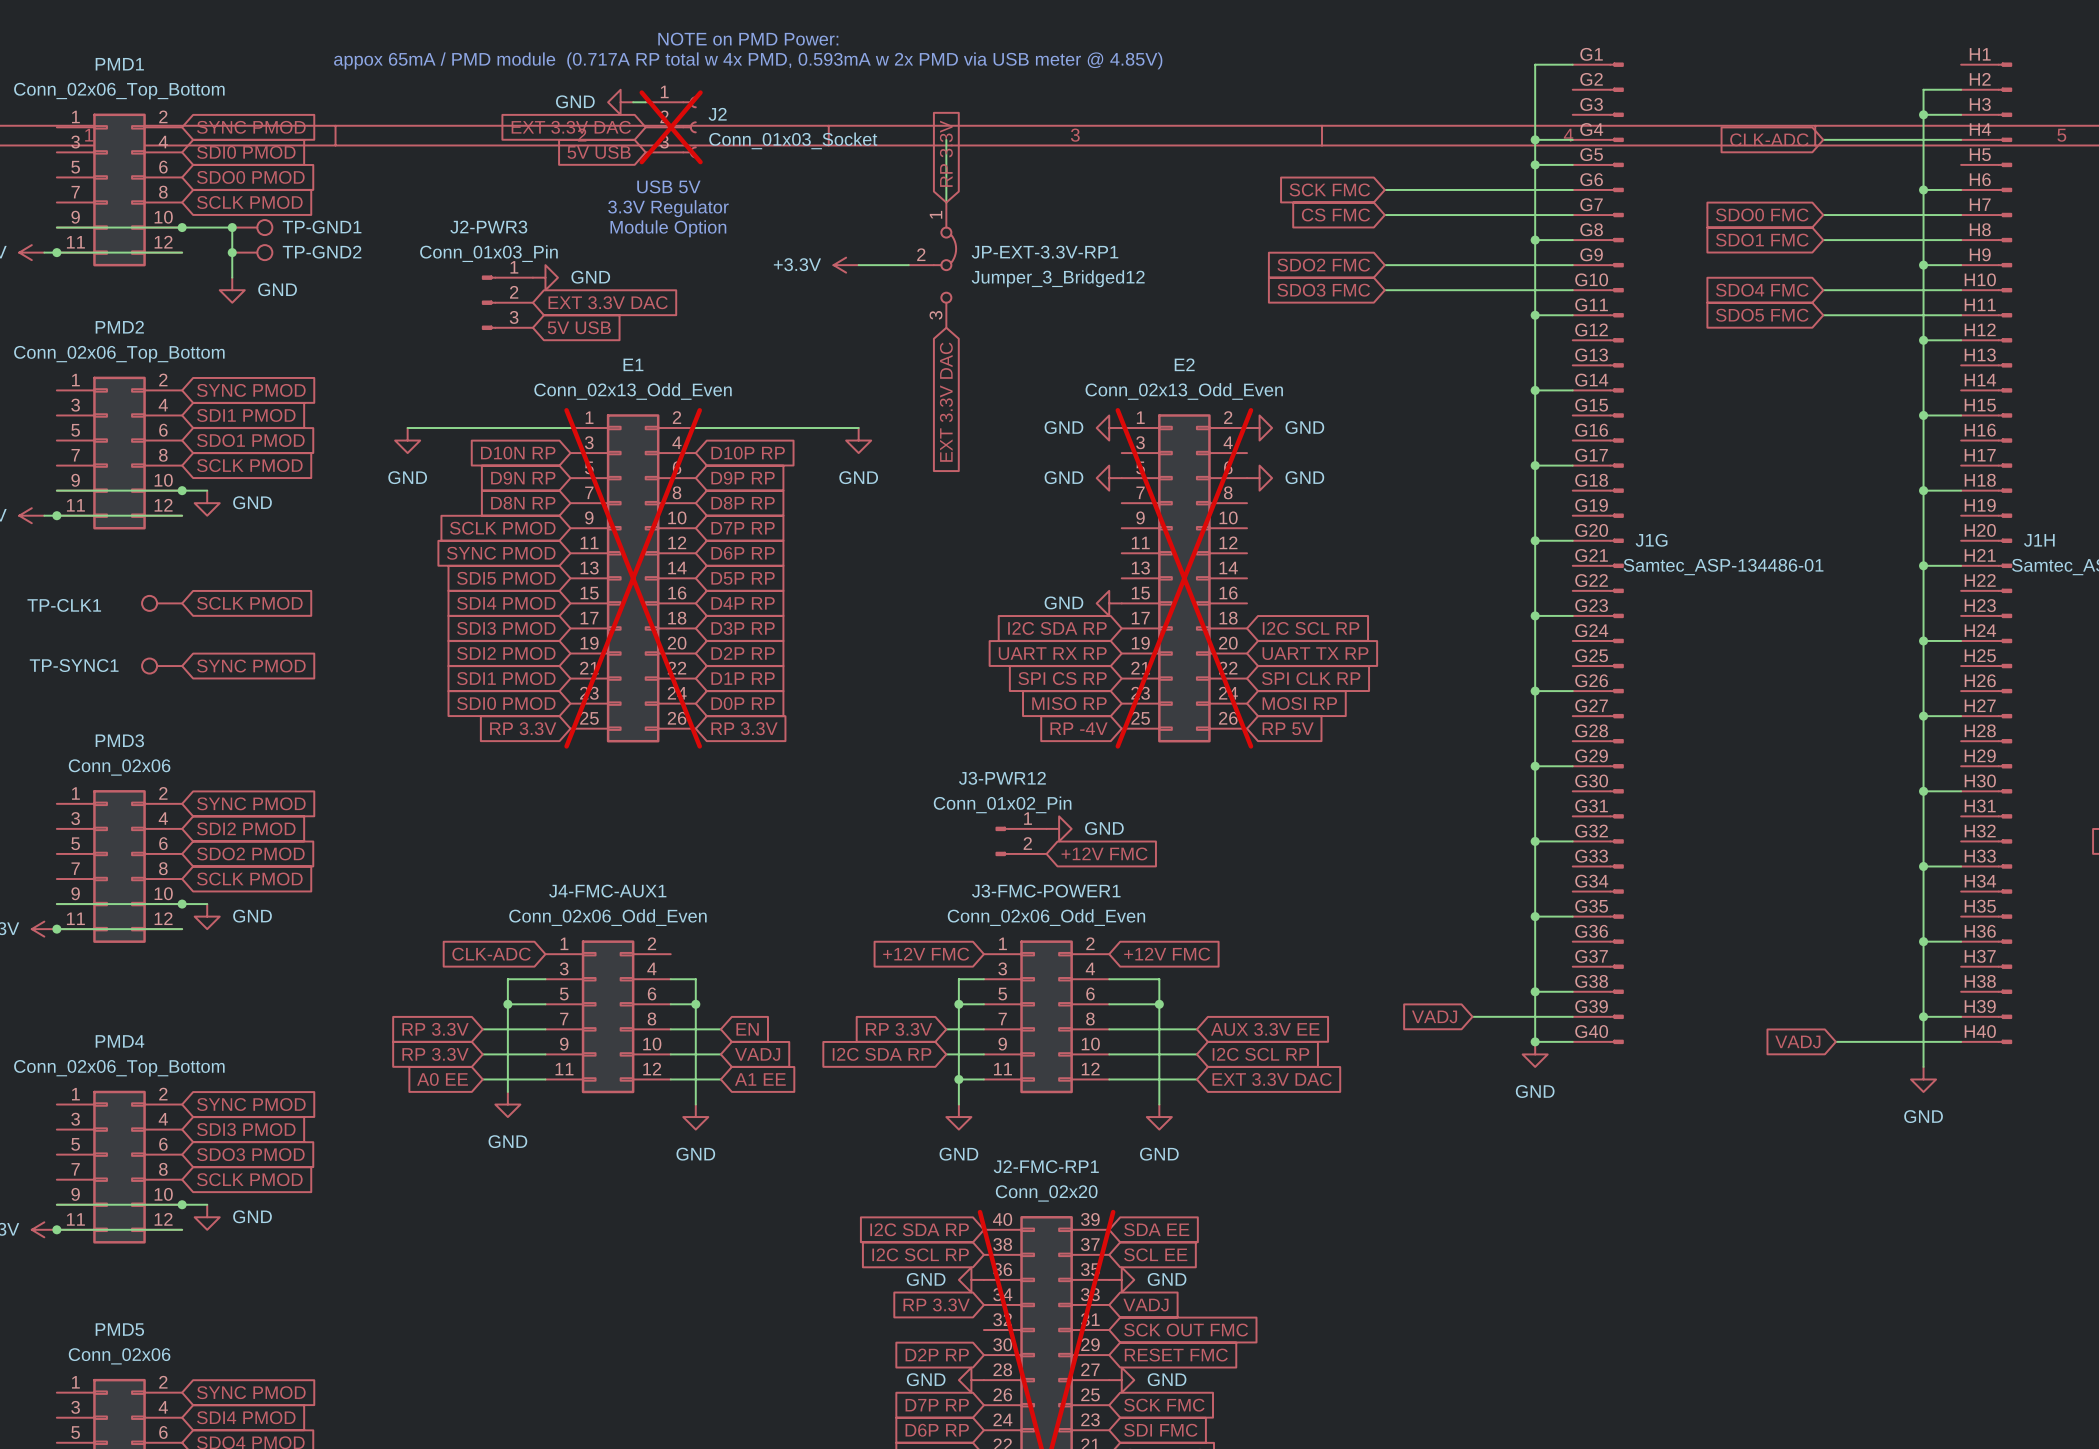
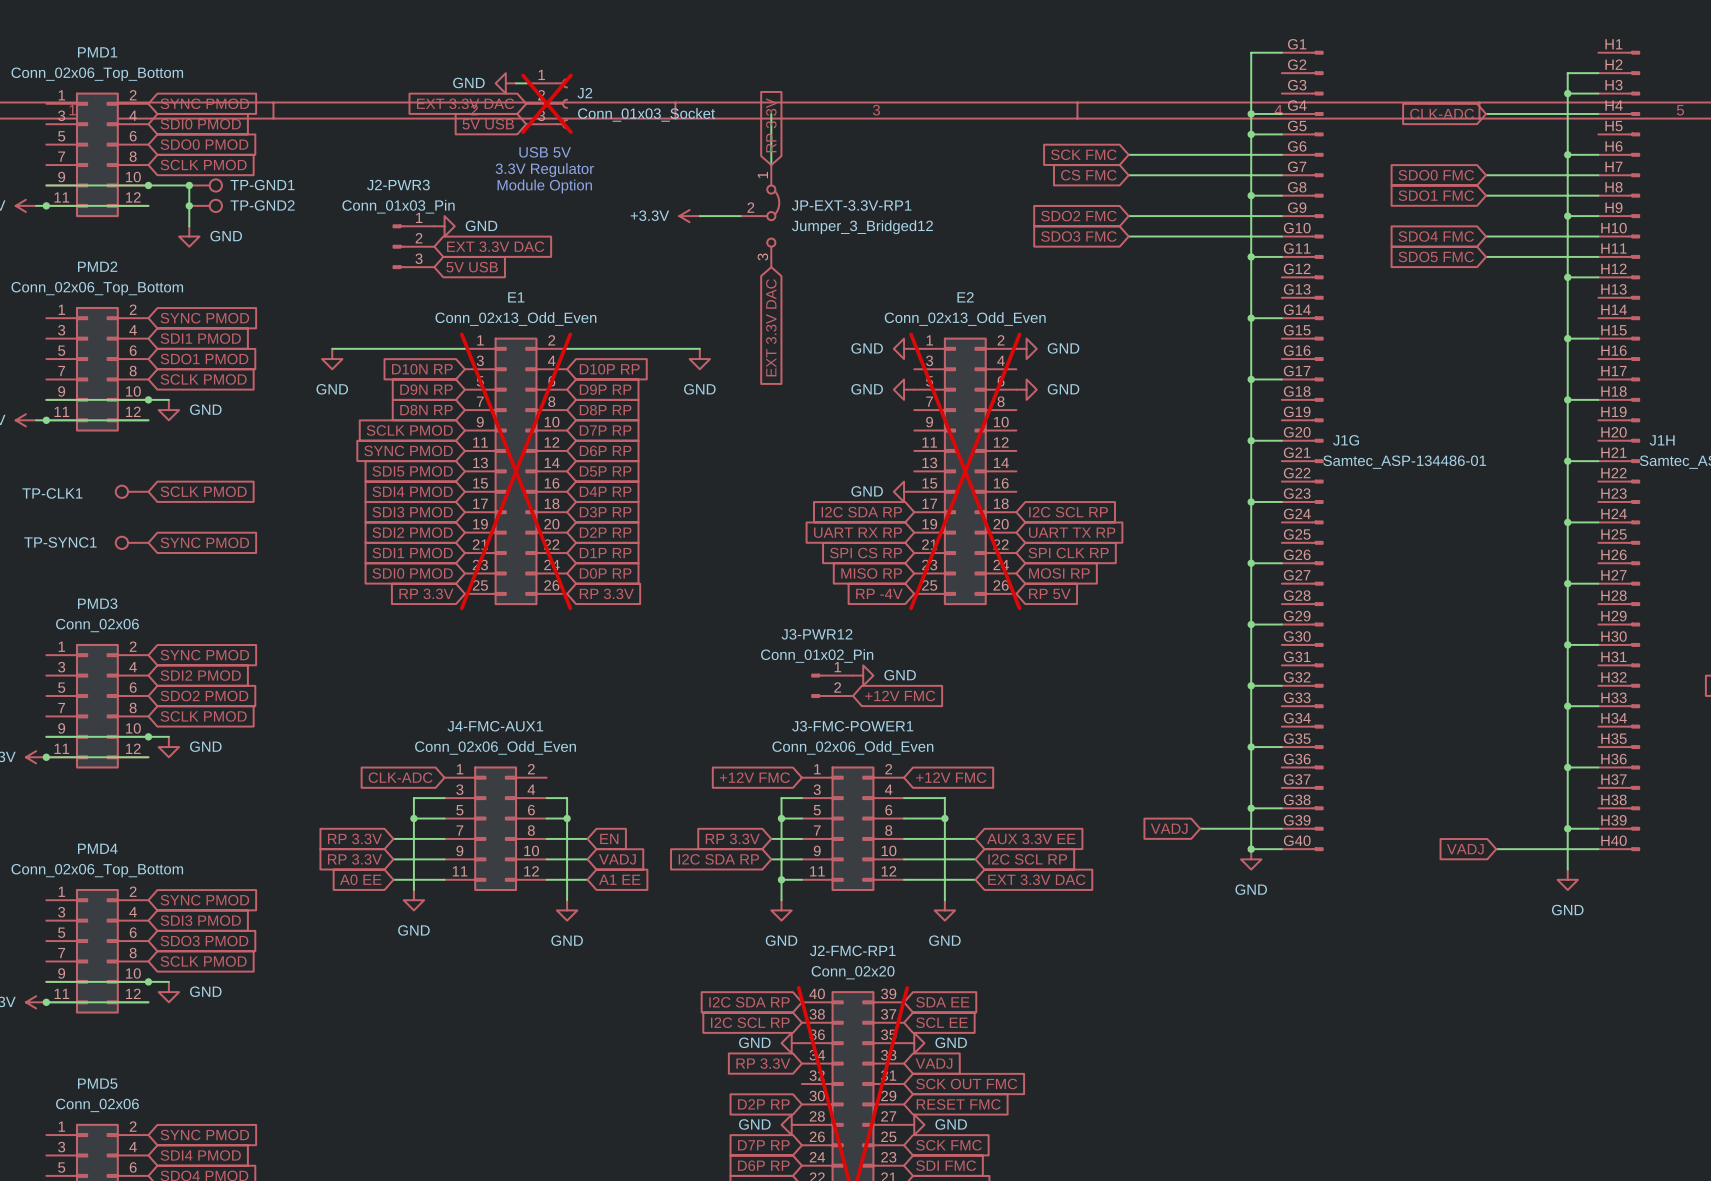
text: NOTE on PMD Power: (748, 39) -> none
text: appox 65mA / PMD module (0.717A RP total w 4x PMD, 0.593mA w 2x PMD via USB meter @ 4.85V) (748, 60) -> none

